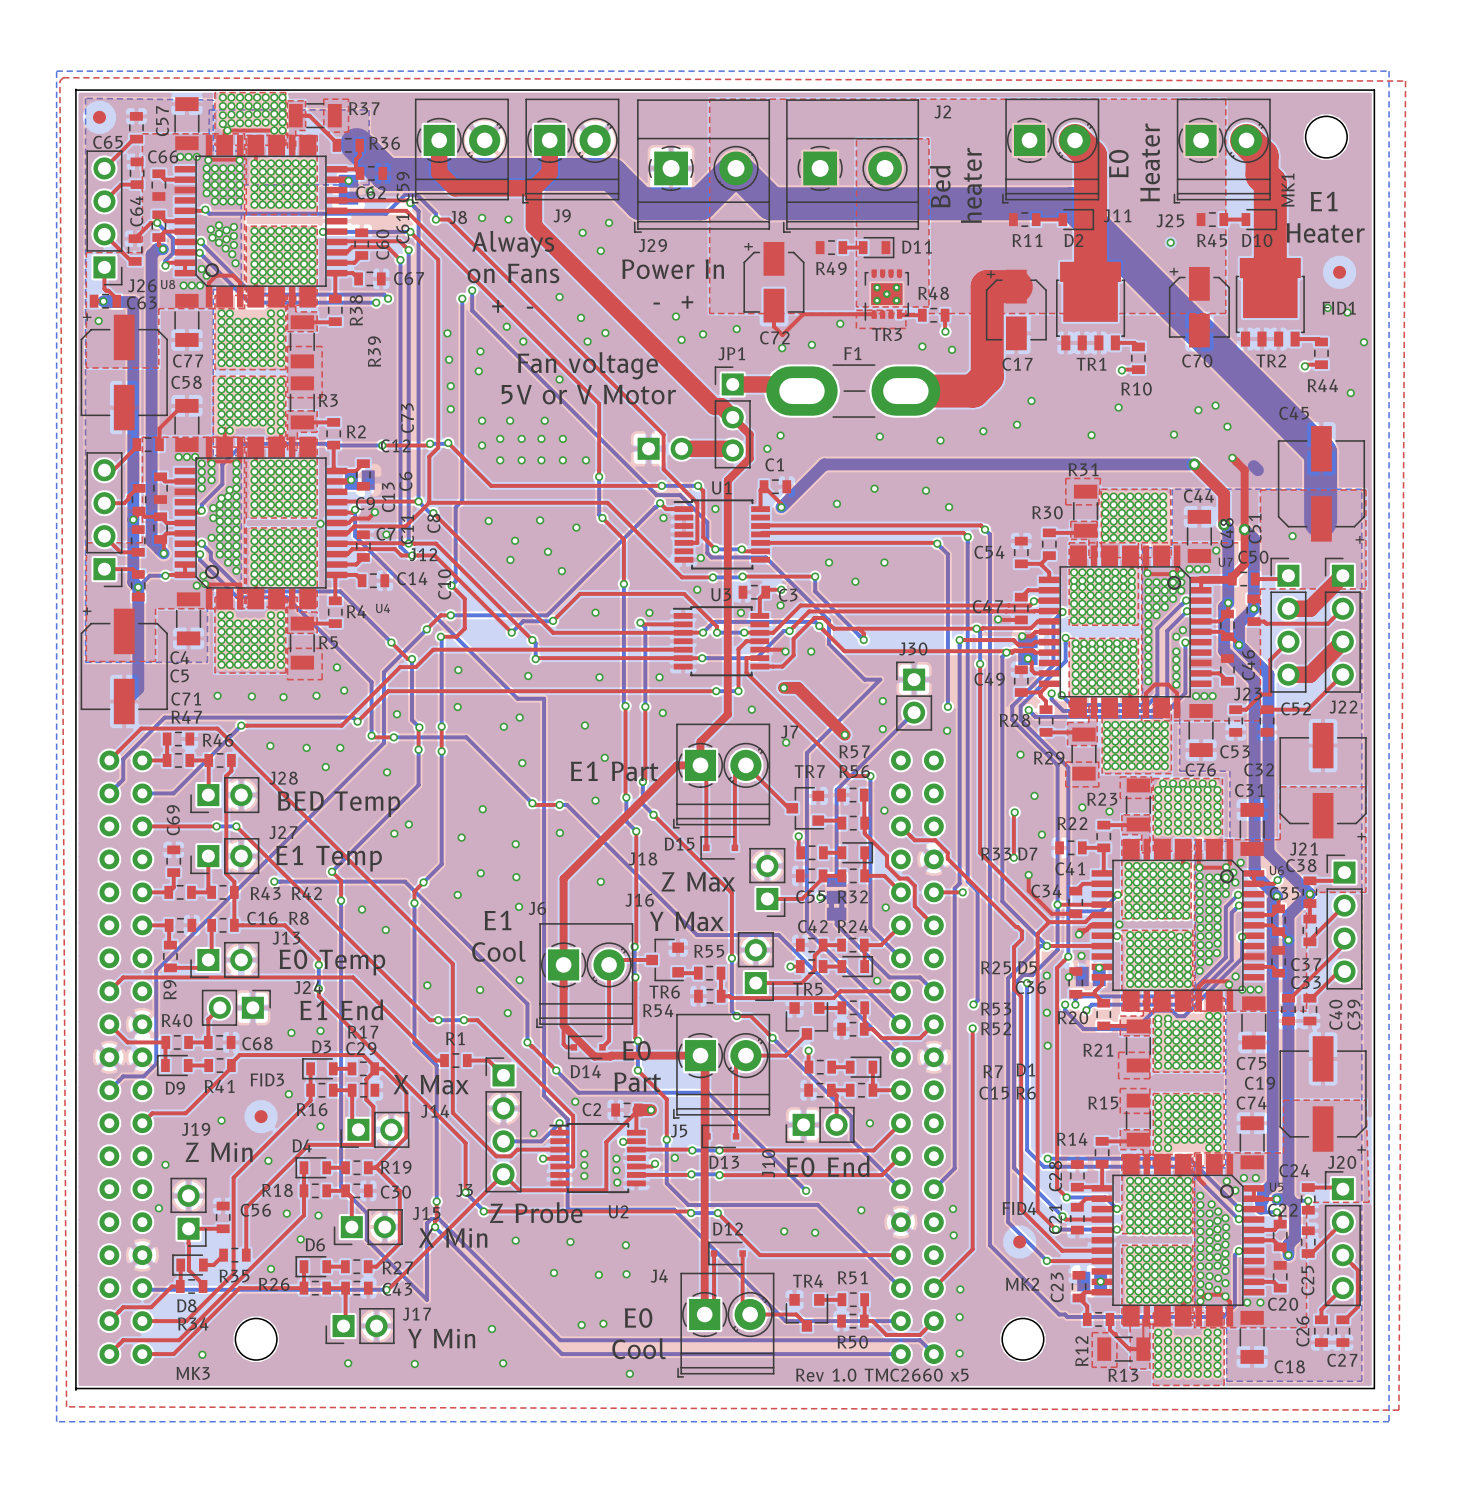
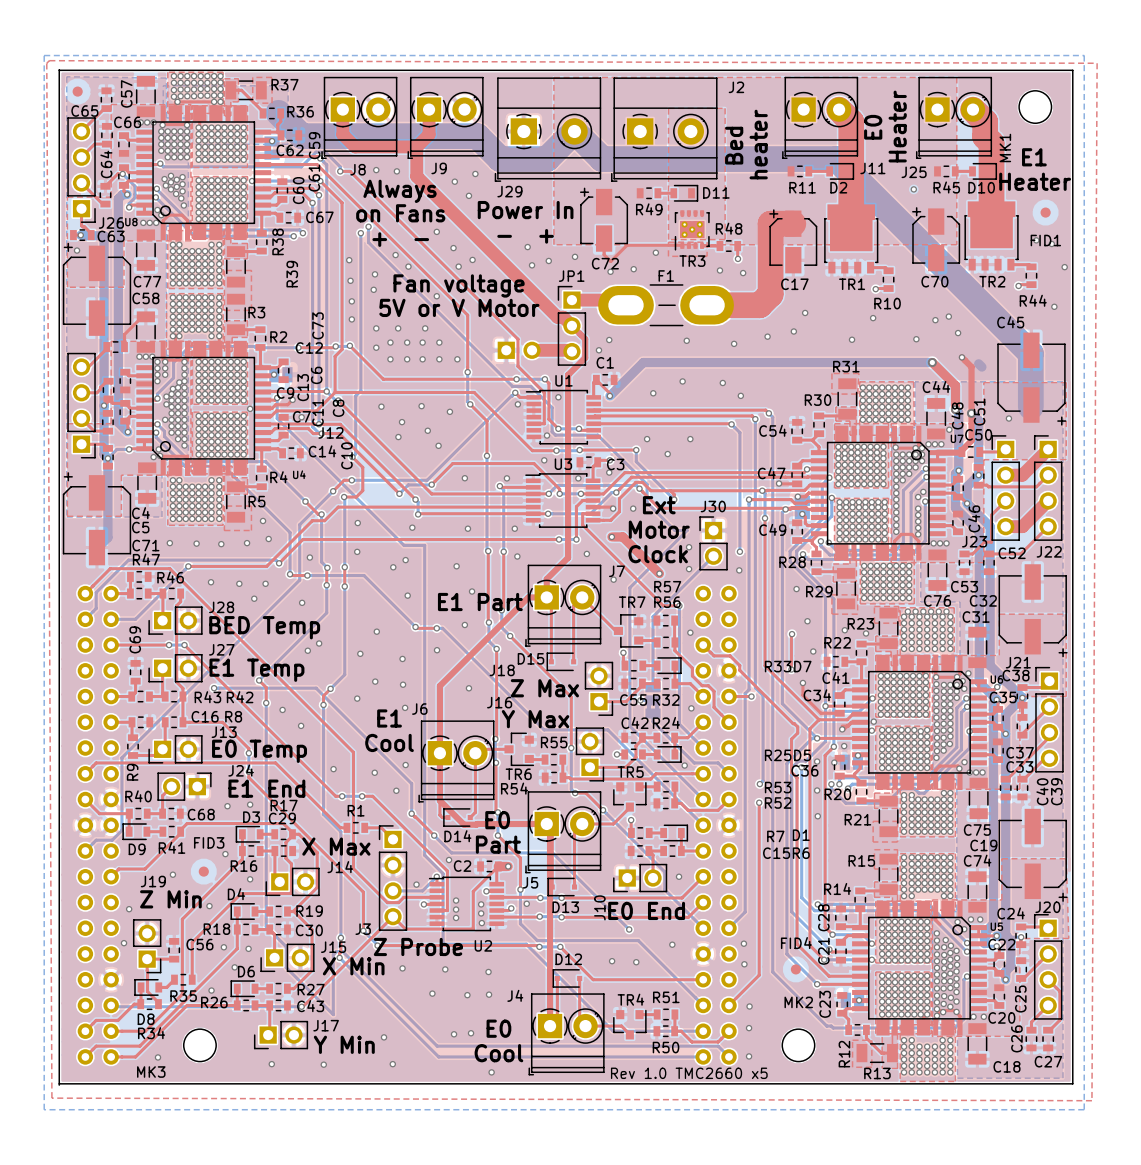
text: none -> Ext (659, 505)
text: none -> Motor (659, 529)
text: none -> Clock (658, 554)

